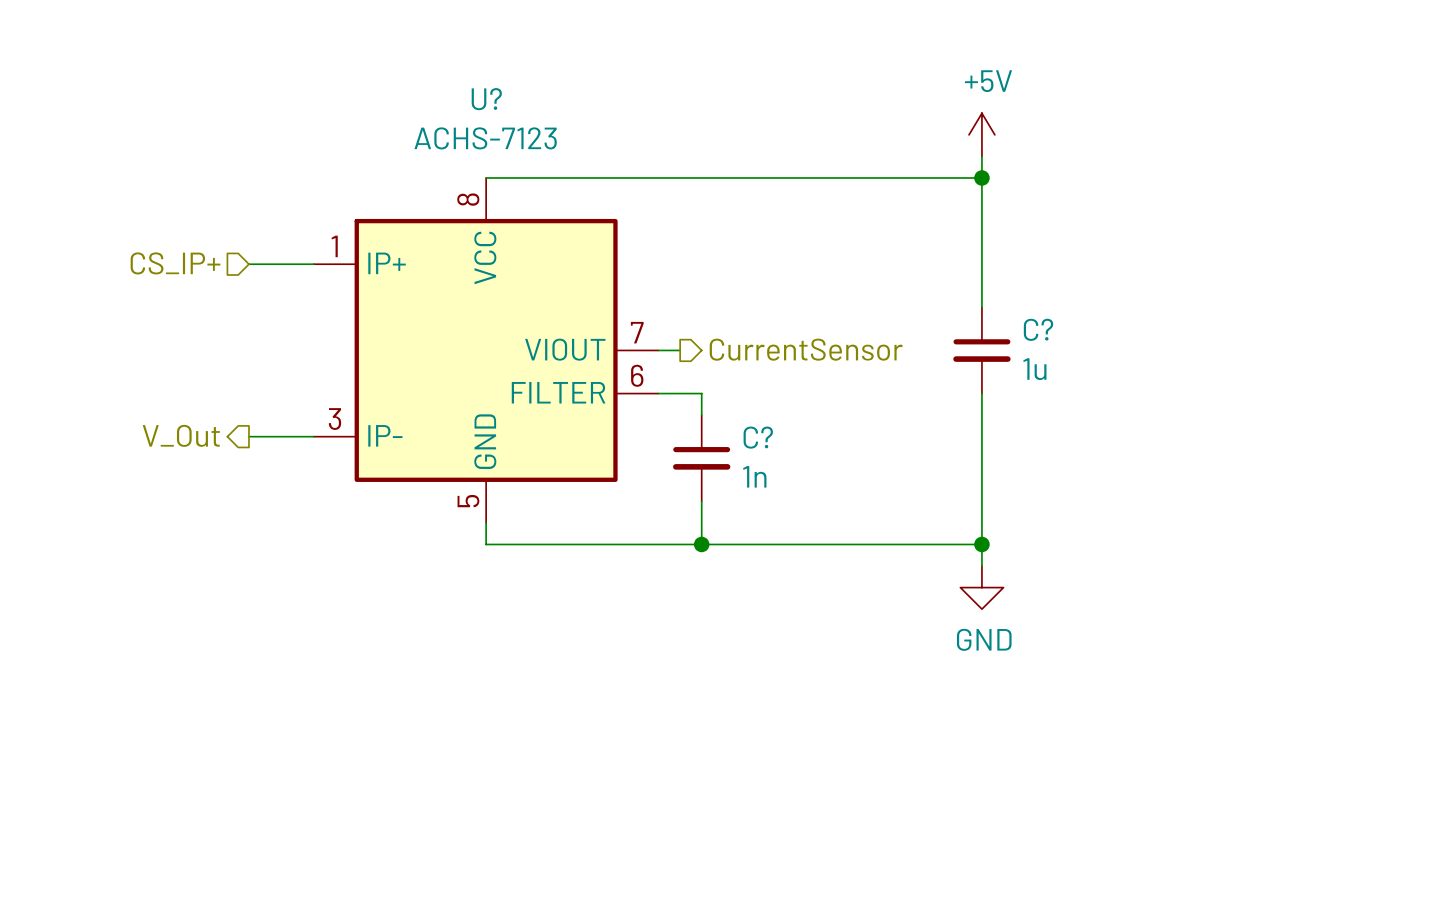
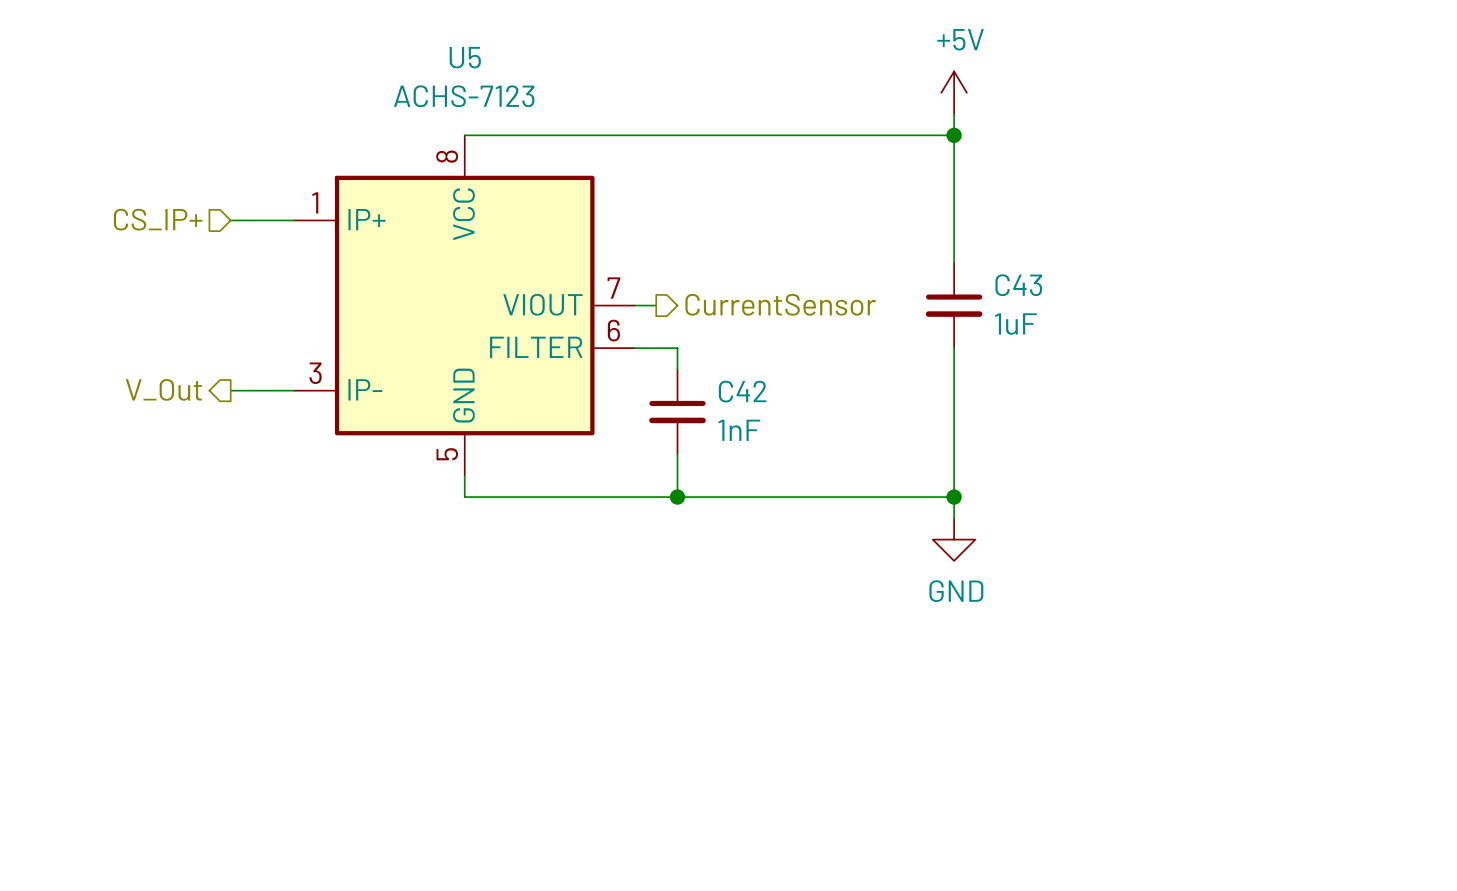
U? name: U? (486, 99) -> U5 (465, 57)
C? name: C? (1038, 329) -> C43 (1018, 285)
C? value: 1u (1034, 369) -> 1uF (1015, 324)
C? name: C? (758, 437) -> C42 (742, 391)
C? value: 1n (754, 476) -> 1nF (739, 430)

